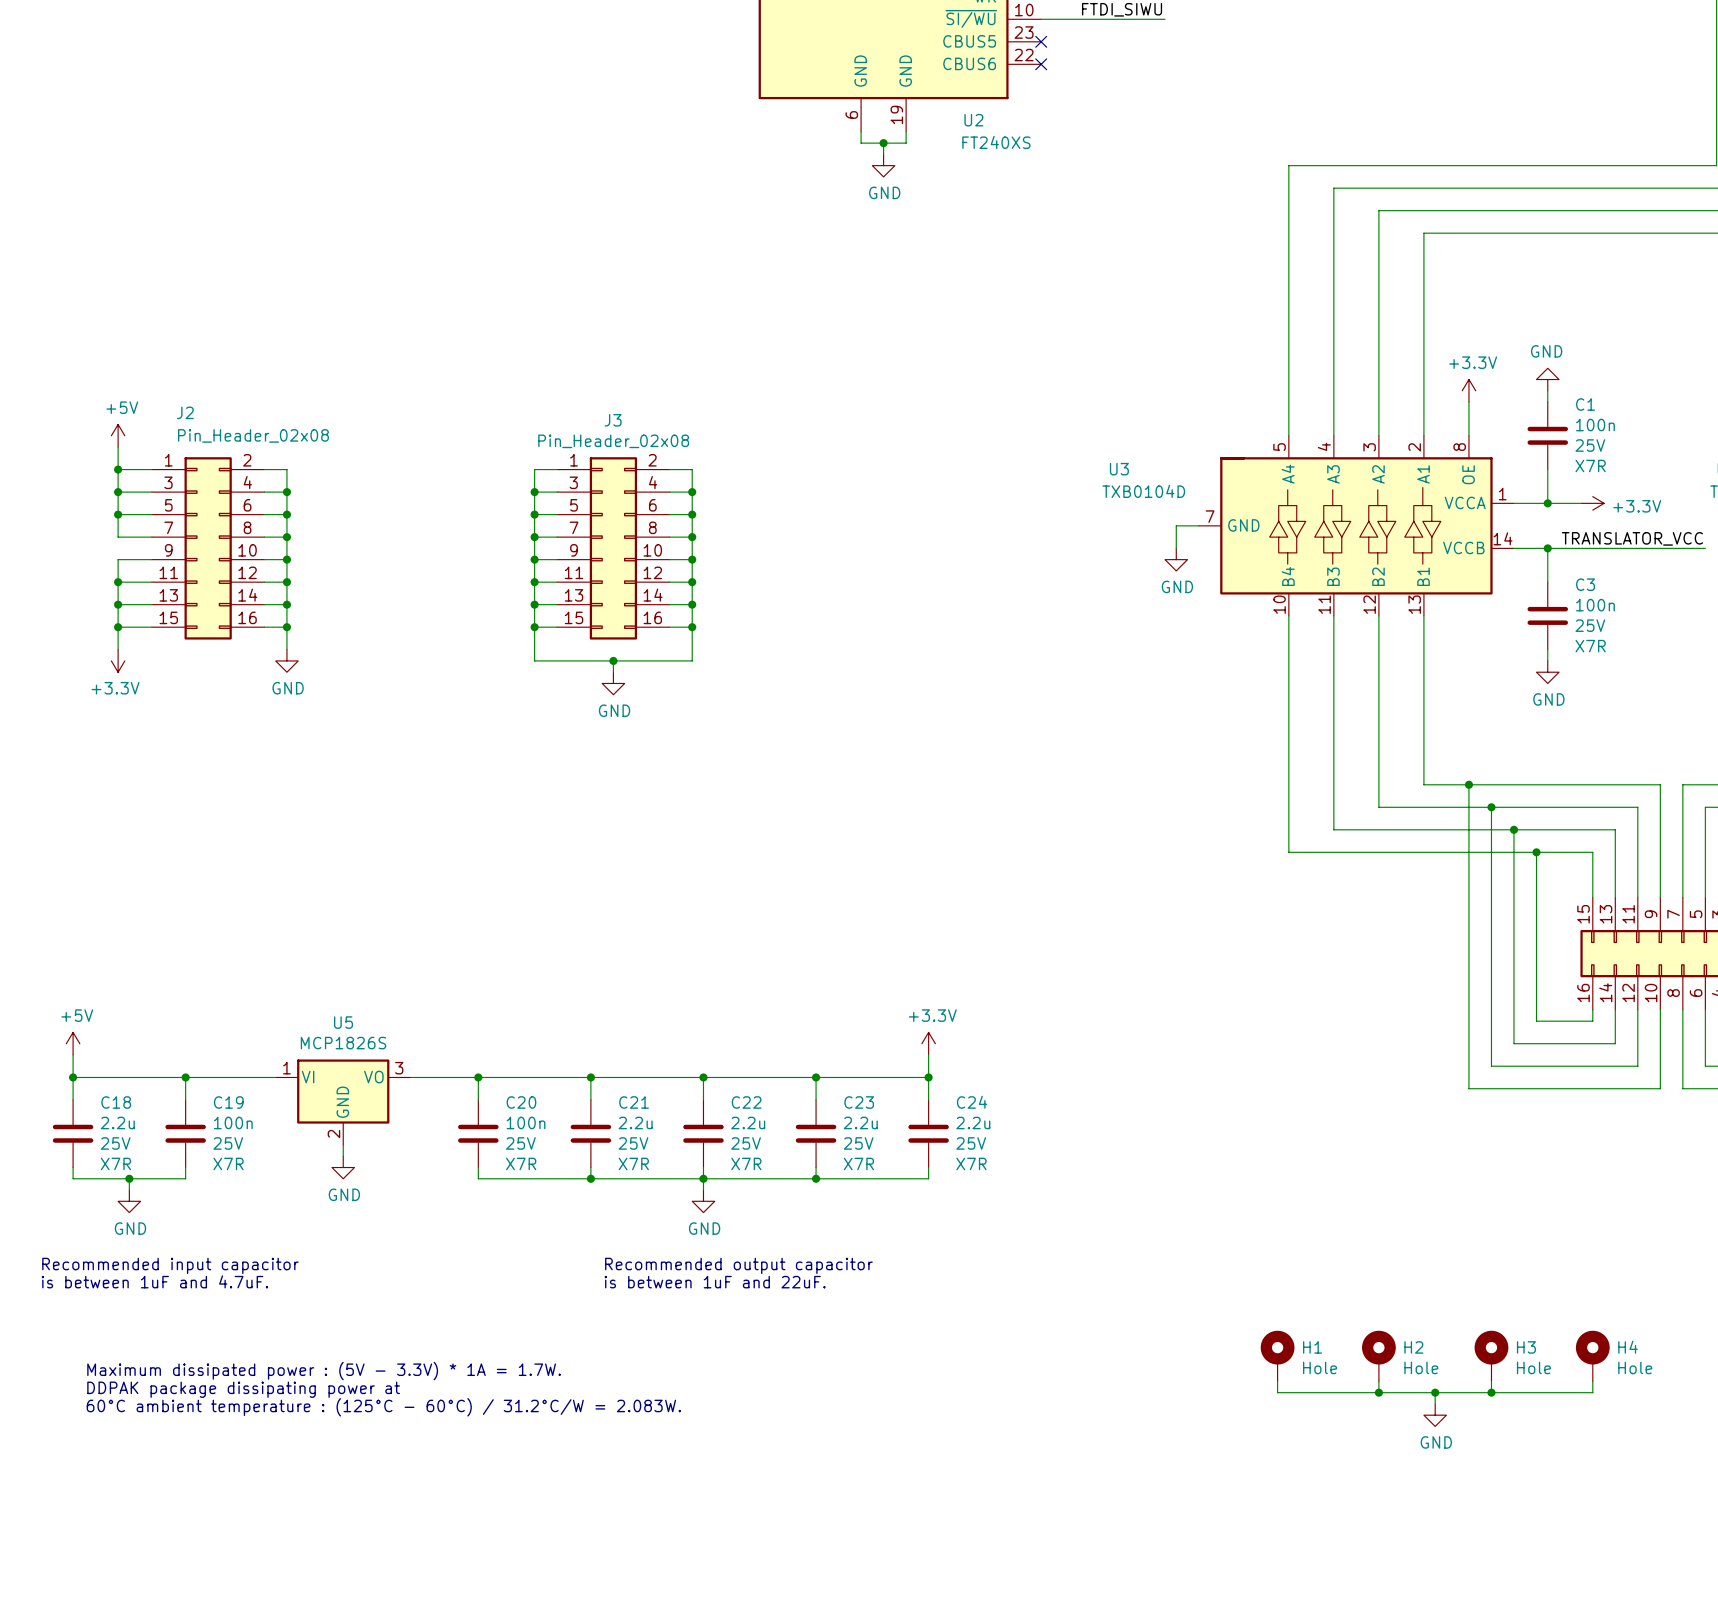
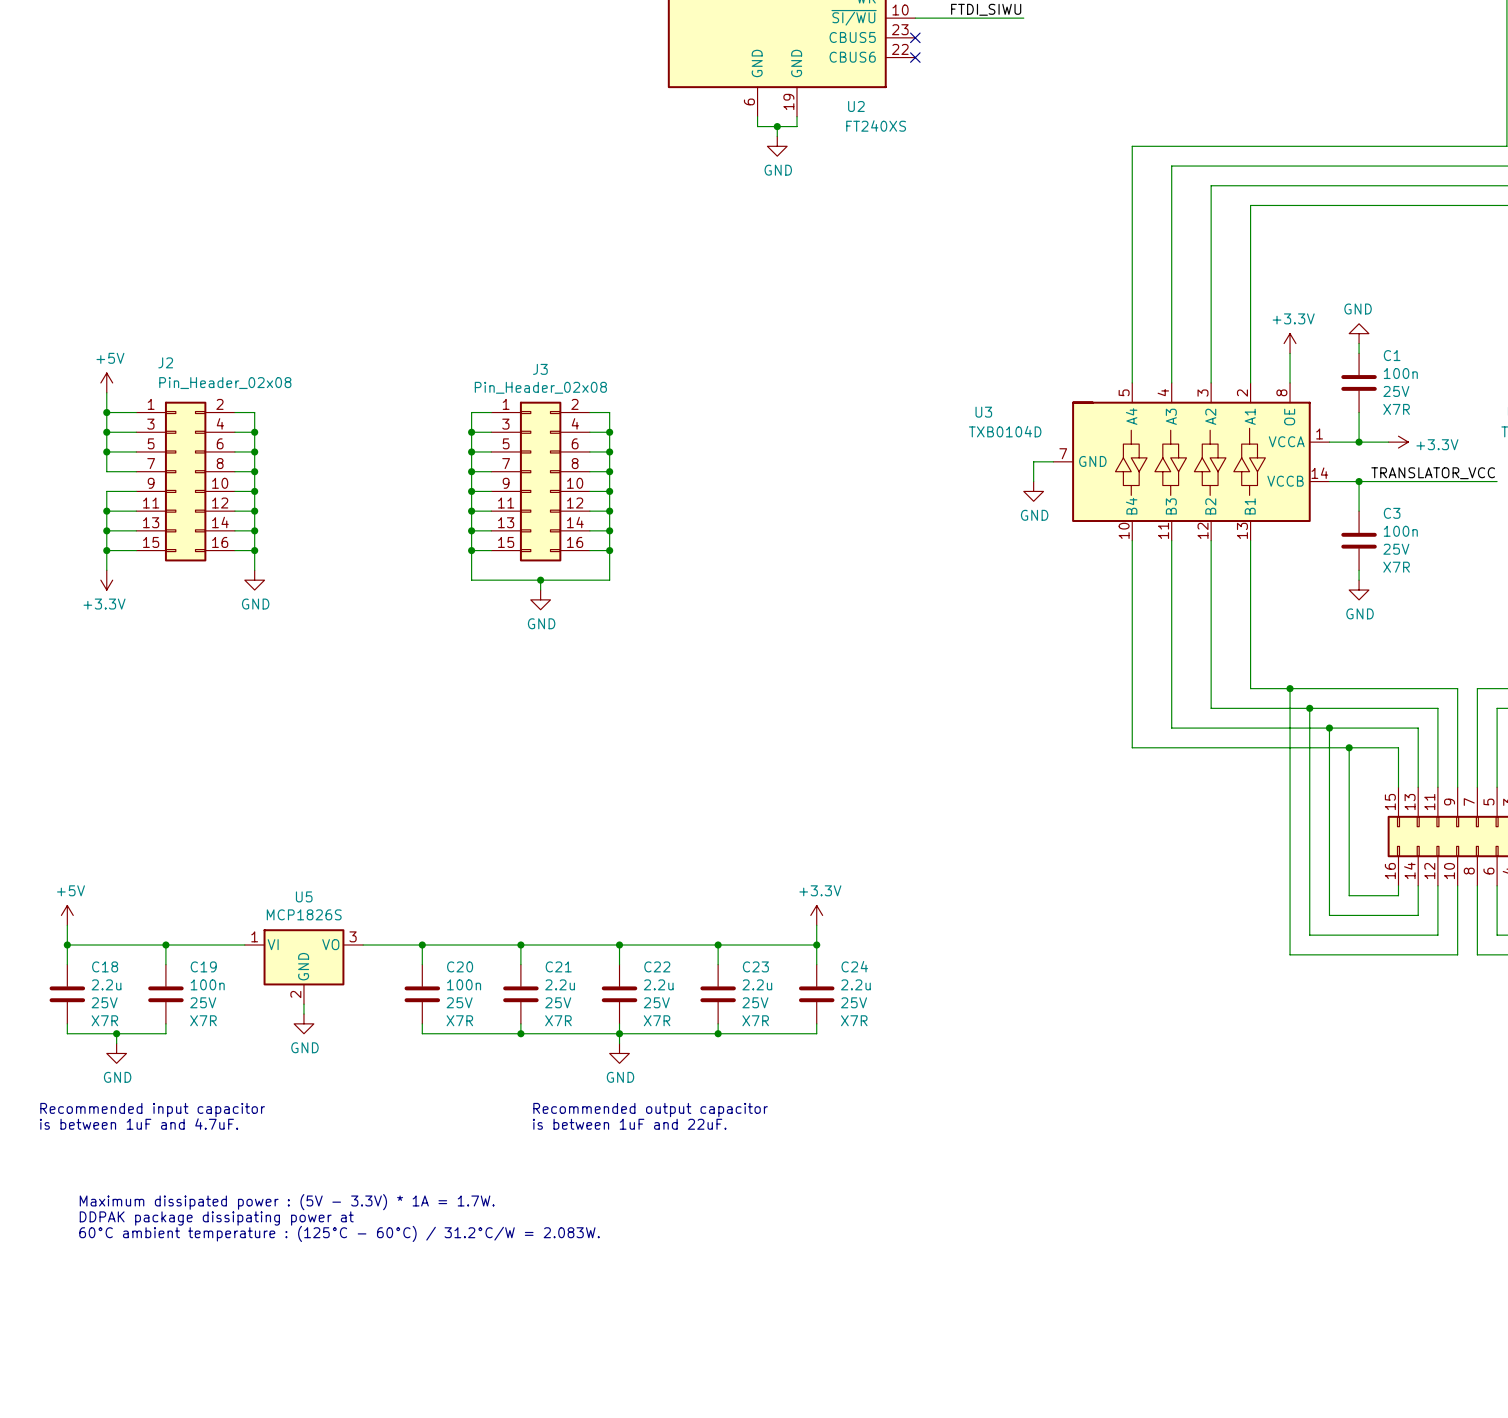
H1: Hole (1277, 1356) -> none
H2: Hole (1378, 1356) -> none
H3: Hole (1491, 1356) -> none
H4: Hole (1592, 1356) -> none
wire: (1277, 1381) (1277, 1392) (1592, 1392) (1592, 1381) -> none
wire: (1378, 1381) (1378, 1392) -> none
wire: (1491, 1381) (1491, 1392) -> none
junction: (1378, 1392) -> none
wire: (1435, 1392) (1435, 1403) -> none
junction: (1435, 1392) -> none
junction: (1491, 1392) -> none
power symbol: GND (1435, 1415) -> none

